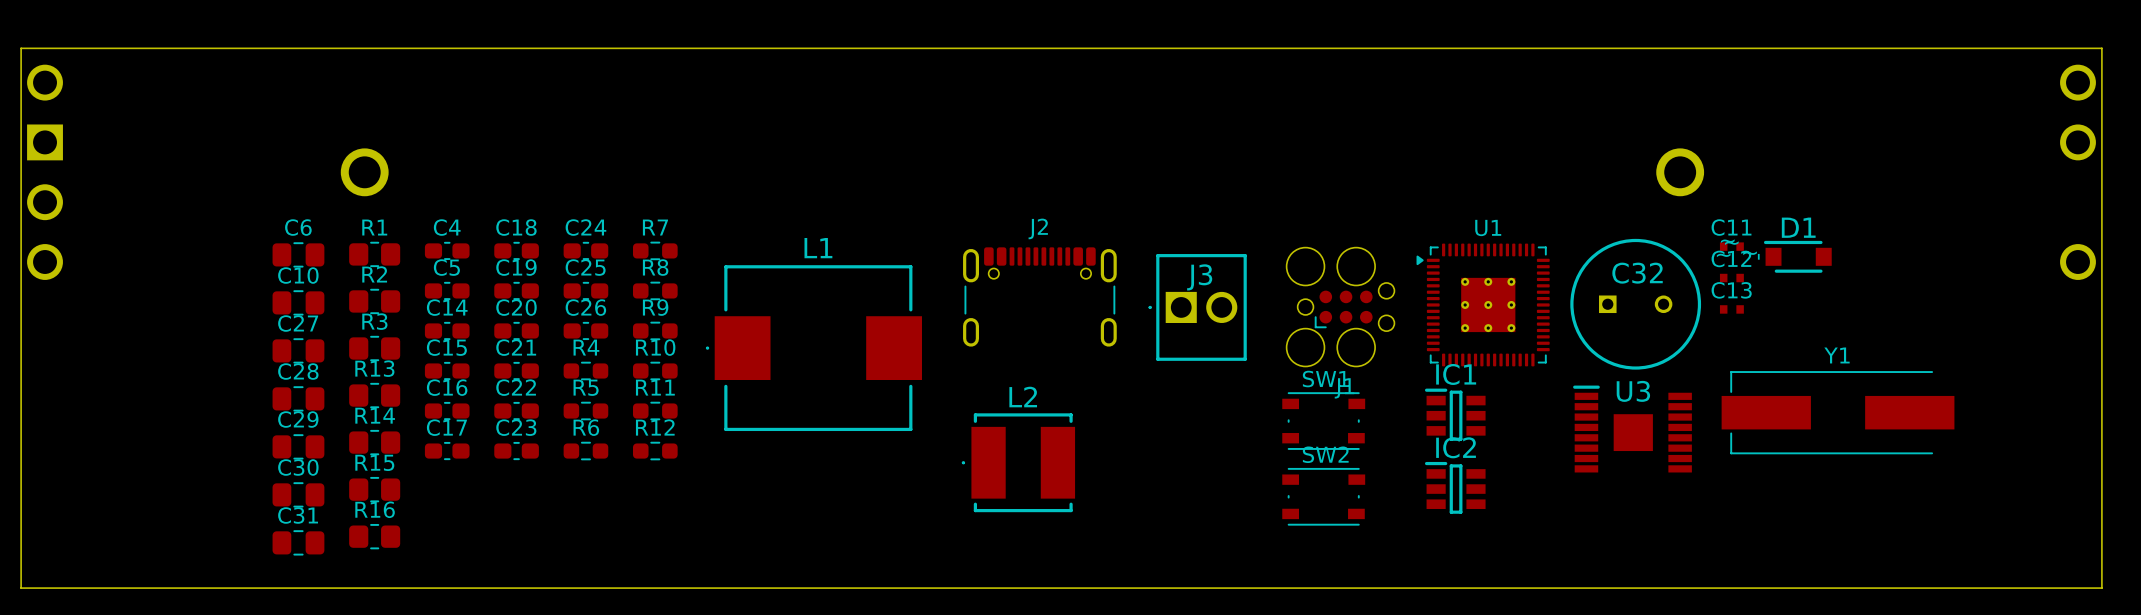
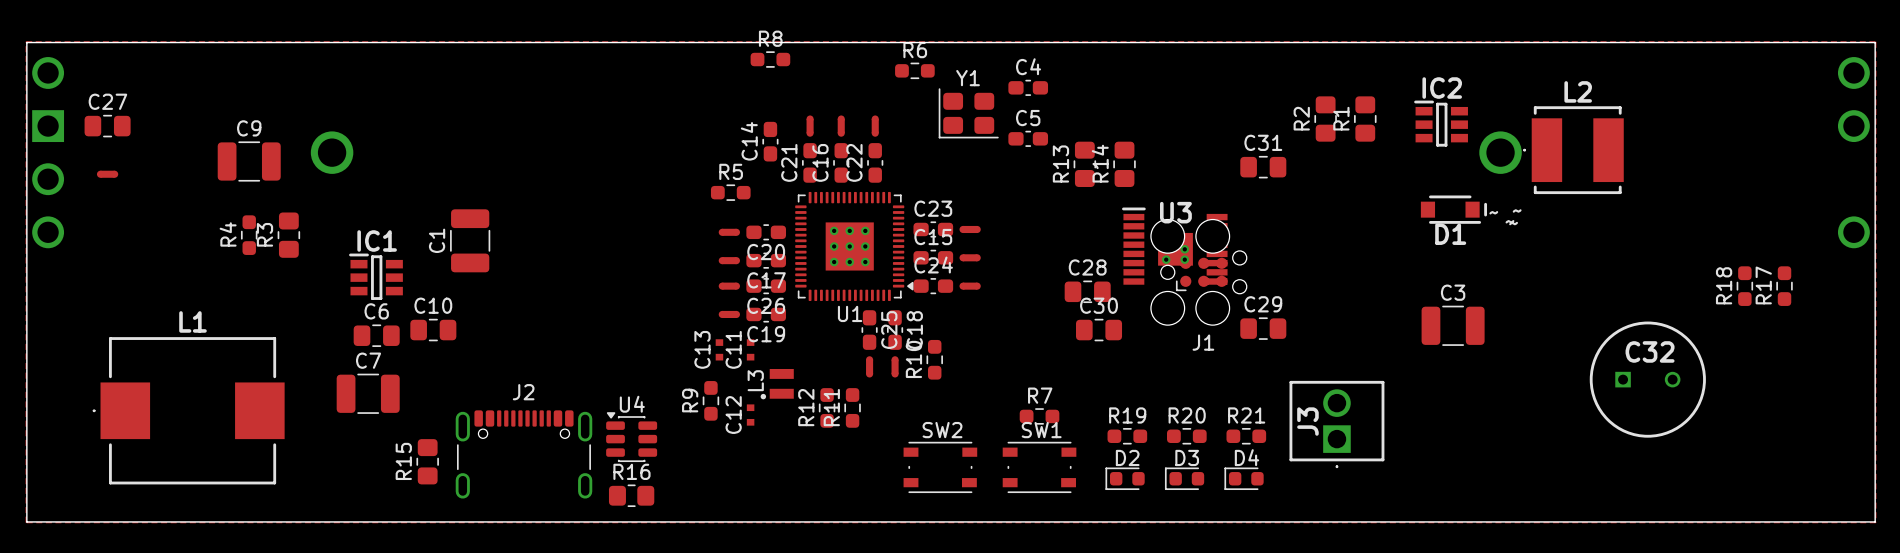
zone outline: none -> (26, 41) (1875, 41) (1875, 522) (26, 522) (26, 41)
part: none -> (810, 126)
part: none -> (841, 126)
part: none -> (875, 126)
C9: none -> (249, 161)
part: none -> (107, 174)
R1 name position: R1 (374, 227) -> R1 (1341, 118)
U1 name position: U1 (1488, 228) -> U1 (850, 313)
U1 footprint: [1416, 243, 1550, 367] -> [795, 191, 914, 302]
C11 rotation: 0° (1731, 246) -> 90° clockwise (750, 349)
C11 position: (1731, 246) -> (750, 349)
C4 position: (447, 250) -> (1028, 87)
C18 rotation: 0° (516, 250) -> 90° clockwise (895, 330)
C18 position: (516, 250) -> (895, 330)
C24 position: (585, 250) -> (933, 286)
R7 position: (655, 250) -> (1039, 416)
C6 position: (298, 254) -> (376, 335)
R1 rotation: 0° (374, 254) -> 90° clockwise (1365, 119)
R1 position: (374, 254) -> (1365, 119)
D1 rotation: 0° (1797, 256) -> 180° (1450, 209)
D1 position: (1797, 256) -> (1450, 209)
part: none -> (970, 229)
via: none -> (834, 230)
via: none -> (849, 230)
via: none -> (865, 230)
part: none -> (729, 232)
C19 name position: C19 (516, 267) -> C19 (766, 334)
C1: none -> (470, 240)
R2 name position: R2 (374, 274) -> R2 (1301, 118)
via: none -> (834, 246)
via: none -> (849, 246)
via: none -> (865, 246)
C12 rotation: 0° (1731, 278) -> 90° clockwise (750, 415)
C12 position: (1731, 278) -> (750, 415)
via: none -> (1184, 249)
C5 position: (447, 290) -> (1028, 138)
C19 position: (516, 290) -> (766, 314)
C25 rotation: 0° (585, 290) -> 90° clockwise (869, 330)
C25 position: (585, 290) -> (869, 330)
R8 position: (655, 290) -> (770, 59)
part: none -> (970, 257)
via: none -> (1166, 259)
via: none -> (1184, 259)
part: none -> (729, 260)
via: none -> (834, 262)
via: none -> (849, 262)
via: none -> (865, 262)
J2 position: (1039, 297) -> (523, 454)
R2 rotation: 0° (374, 301) -> 90° clockwise (1325, 119)
R2 position: (374, 301) -> (1325, 119)
C10 position: (298, 302) -> (433, 330)
C32 position: (1635, 304) -> (1647, 379)
C14 name position: C14 (447, 307) -> C14 (749, 141)
C20 name position: C20 (516, 307) -> C20 (766, 252)
C26 name position: C26 (585, 307) -> C26 (766, 305)
R9 name position: R9 (655, 307) -> R9 (690, 400)
J3 rotation: 0° (1197, 307) -> 90° counterclockwise (1336, 424)
J3 position: (1197, 307) -> (1336, 424)
C13 rotation: 0° (1731, 309) -> 90° clockwise (719, 349)
C13 position: (1731, 309) -> (719, 349)
R3 name position: R3 (374, 321) -> R3 (264, 234)
part: none -> (729, 286)
part: none -> (970, 286)
R18: none -> (1744, 286)
R17: none -> (1784, 286)
C14 rotation: 0° (447, 330) -> 90° clockwise (770, 141)
C14 position: (447, 330) -> (770, 141)
C20 position: (516, 330) -> (766, 232)
C26 position: (585, 330) -> (766, 286)
R9 rotation: 0° (655, 330) -> 90° clockwise (710, 400)
R9 position: (655, 330) -> (710, 400)
C21 name position: C21 (516, 347) -> C21 (789, 162)
R4 name position: R4 (586, 347) -> R4 (228, 234)
R10 name position: R10 (655, 347) -> R10 (913, 359)
R3 rotation: 0° (374, 348) -> 90° clockwise (288, 235)
R3 position: (374, 348) -> (288, 235)
L1 position: (813, 348) -> (188, 410)
C27 position: (298, 350) -> (107, 126)
part: none -> (729, 314)
C3: none -> (1453, 325)
R13 name position: R13 (374, 368) -> R13 (1060, 163)
C15 position: (447, 370) -> (933, 257)
C21 rotation: 0° (516, 370) -> 90° clockwise (810, 162)
C21 position: (516, 370) -> (810, 162)
R4 rotation: 0° (585, 370) -> 90° clockwise (249, 235)
R4 position: (585, 370) -> (249, 235)
R10 rotation: 0° (655, 370) -> 90° clockwise (934, 359)
R10 position: (655, 370) -> (934, 359)
Y1 footprint: [1721, 371, 1955, 455] -> [938, 88, 999, 139]
C16 name position: C16 (447, 387) -> C16 (820, 162)
C22 name position: C22 (516, 387) -> C22 (854, 162)
R11 name position: R11 (655, 387) -> R11 (831, 407)
R13 rotation: 0° (374, 395) -> 90° clockwise (1084, 164)
R13 position: (374, 395) -> (1084, 164)
C28 position: (298, 398) -> (1087, 291)
C16 rotation: 0° (447, 411) -> 90° clockwise (841, 162)
C16 position: (447, 411) -> (841, 162)
C22 rotation: 0° (516, 411) -> 90° clockwise (875, 162)
C22 position: (516, 411) -> (875, 162)
R5 position: (585, 411) -> (730, 192)
R11 rotation: 0° (655, 411) -> 90° clockwise (852, 407)
R11 position: (655, 411) -> (852, 407)
part: none -> (869, 366)
part: none -> (895, 366)
IC1 position: (1455, 414) -> (375, 276)
R14 name position: R14 (375, 415) -> R14 (1100, 163)
SW1 position: (1323, 421) -> (1039, 467)
C17 name position: C17 (446, 427) -> C17 (766, 280)
R12 name position: R12 (655, 427) -> R12 (806, 407)
U3 position: (1632, 429) -> (1174, 246)
L3: none -> (777, 384)
R14 rotation: 0° (374, 442) -> 90° clockwise (1124, 164)
R14 position: (374, 442) -> (1124, 164)
C7: none -> (368, 393)
C29 position: (298, 446) -> (1263, 328)
C17 position: (447, 451) -> (766, 260)
C23 position: (516, 451) -> (933, 229)
R6 position: (585, 451) -> (914, 70)
R12 rotation: 0° (655, 451) -> 90° clockwise (827, 407)
R12 position: (655, 451) -> (827, 407)
R15 name position: R15 (374, 462) -> R15 (403, 461)
L2 position: (1018, 462) -> (1573, 150)
IC2 position: (1455, 487) -> (1441, 123)
R15 rotation: 0° (374, 489) -> 90° clockwise (427, 461)
R15 position: (374, 489) -> (427, 461)
R19: none -> (1127, 436)
R20: none -> (1186, 436)
R21: none -> (1246, 436)
U4: none -> (631, 437)
C30 position: (298, 494) -> (1099, 330)
SW2 position: (1323, 496) -> (940, 467)
R16 position: (374, 536) -> (631, 495)
D2: none -> (1125, 478)
D3: none -> (1184, 478)
D4: none -> (1244, 478)
C31 position: (298, 542) -> (1263, 167)

